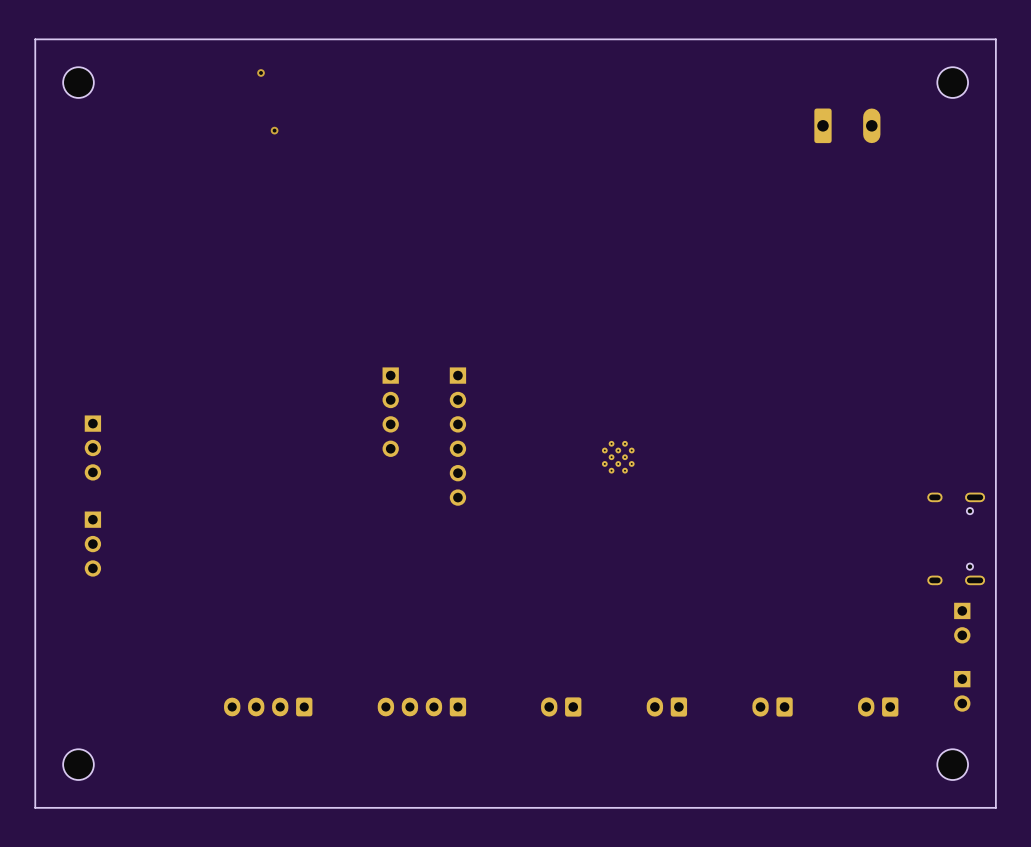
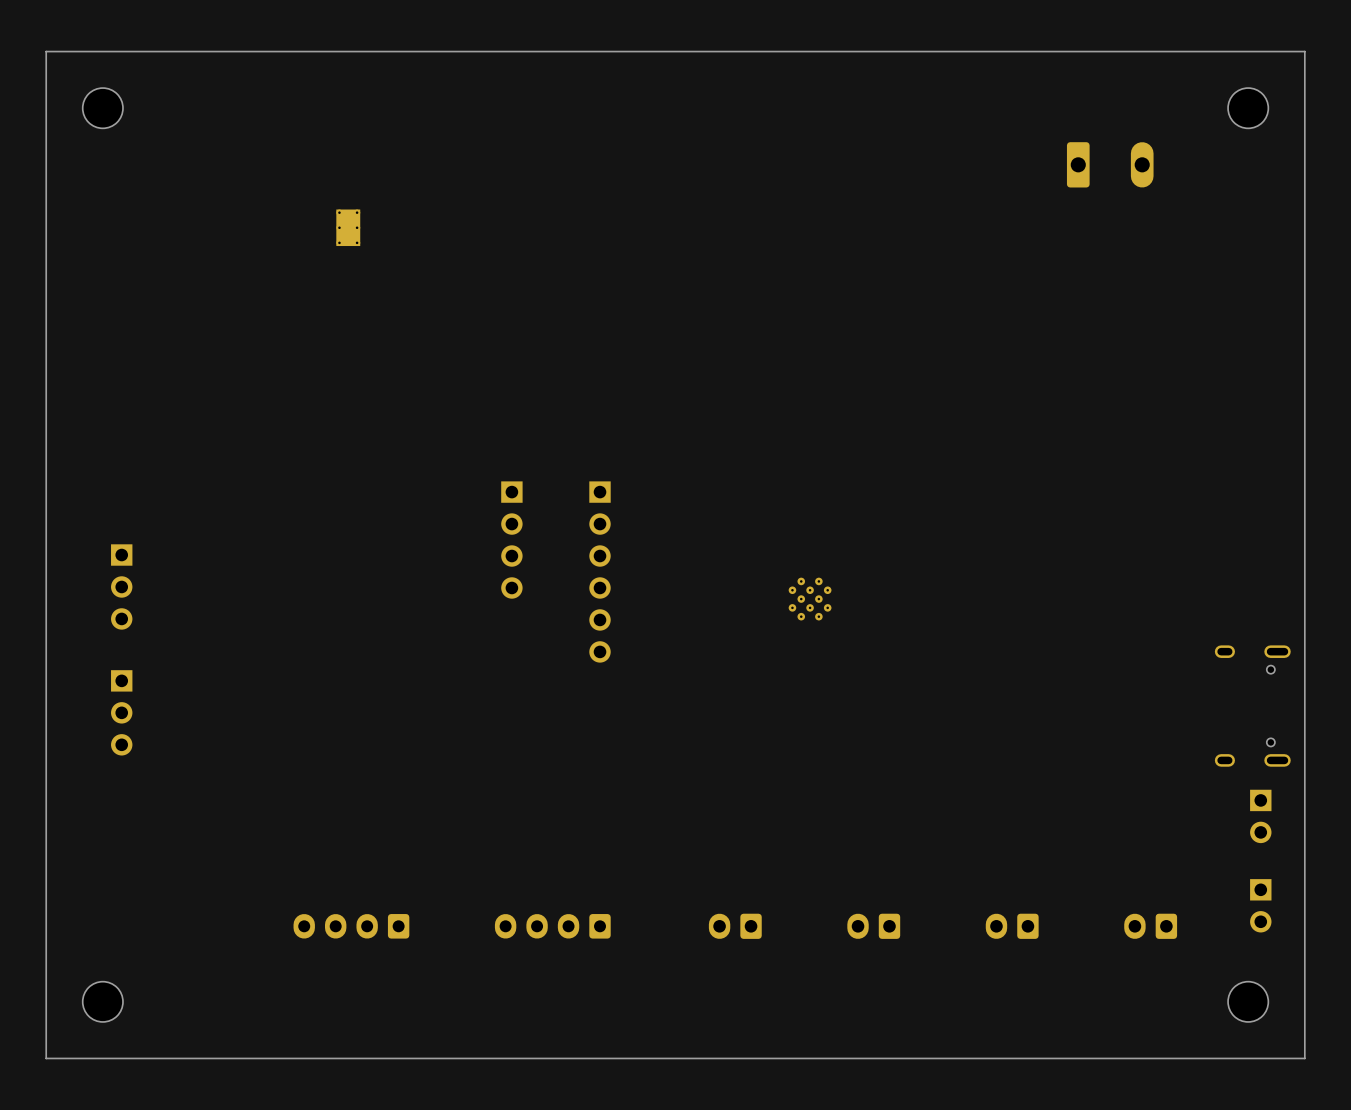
via: (261, 72) -> none
via: (274, 130) -> none
part: none -> (348, 227)

